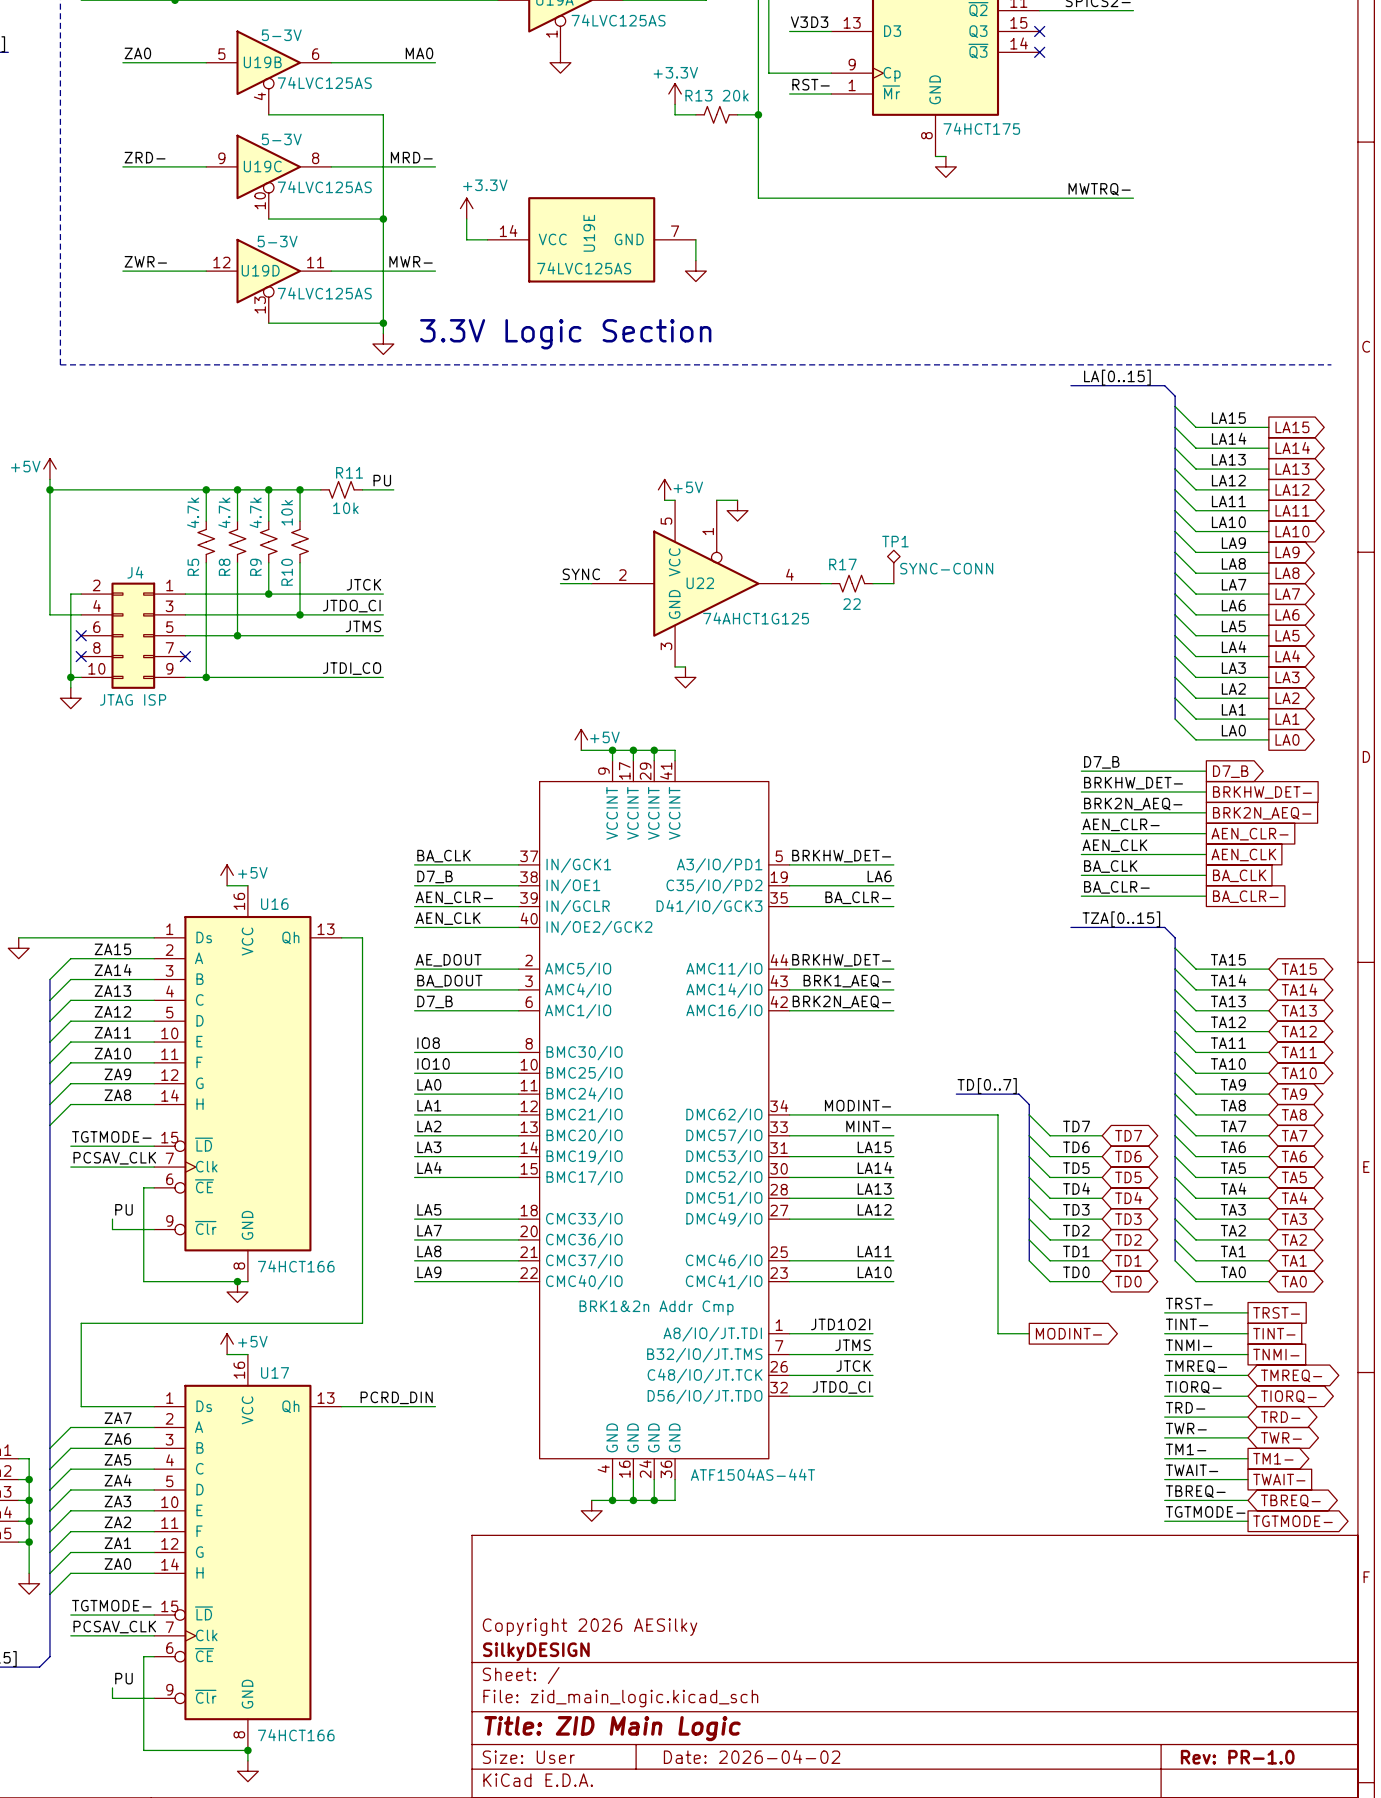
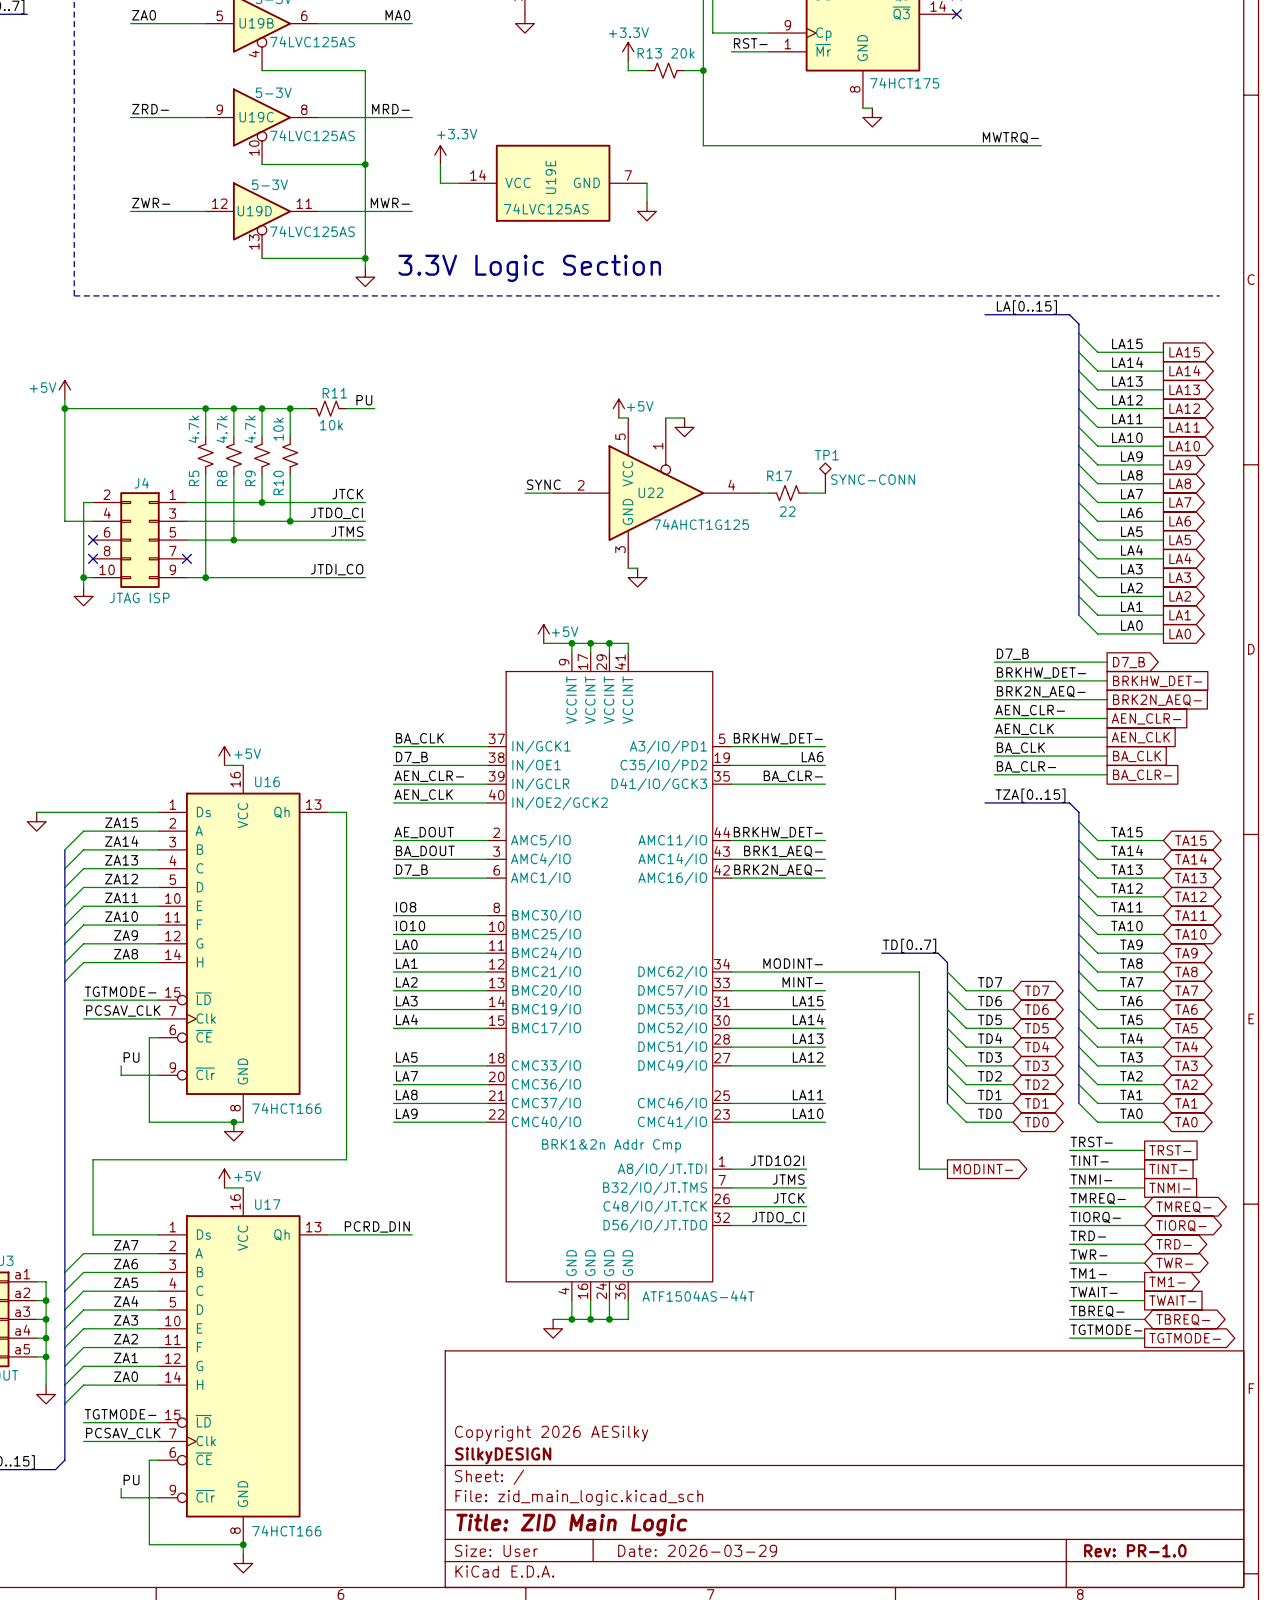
title block: Date: 2026-04-02 (752, 1756) -> Date: 2026-03-29 (697, 1550)

